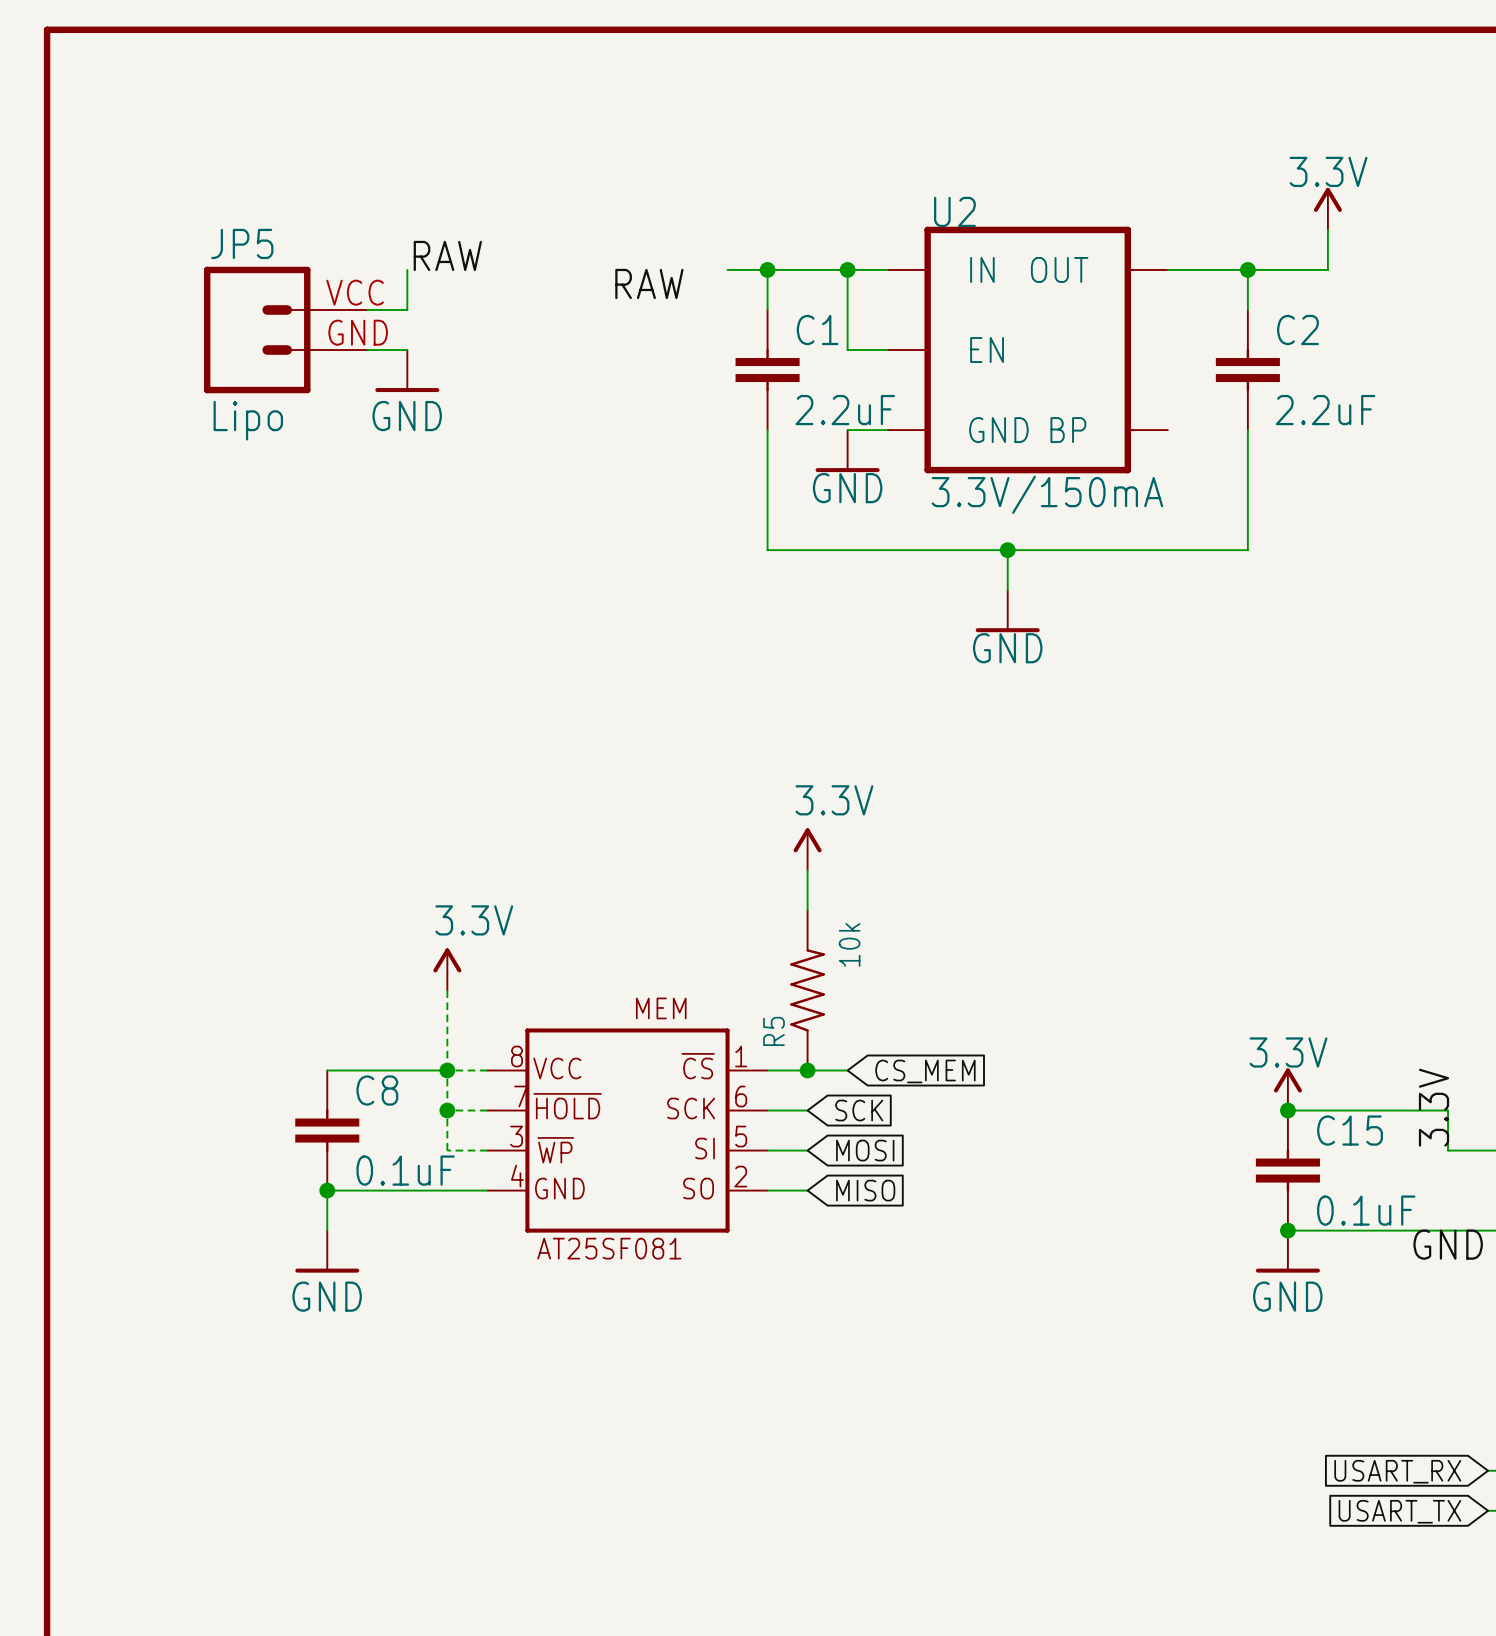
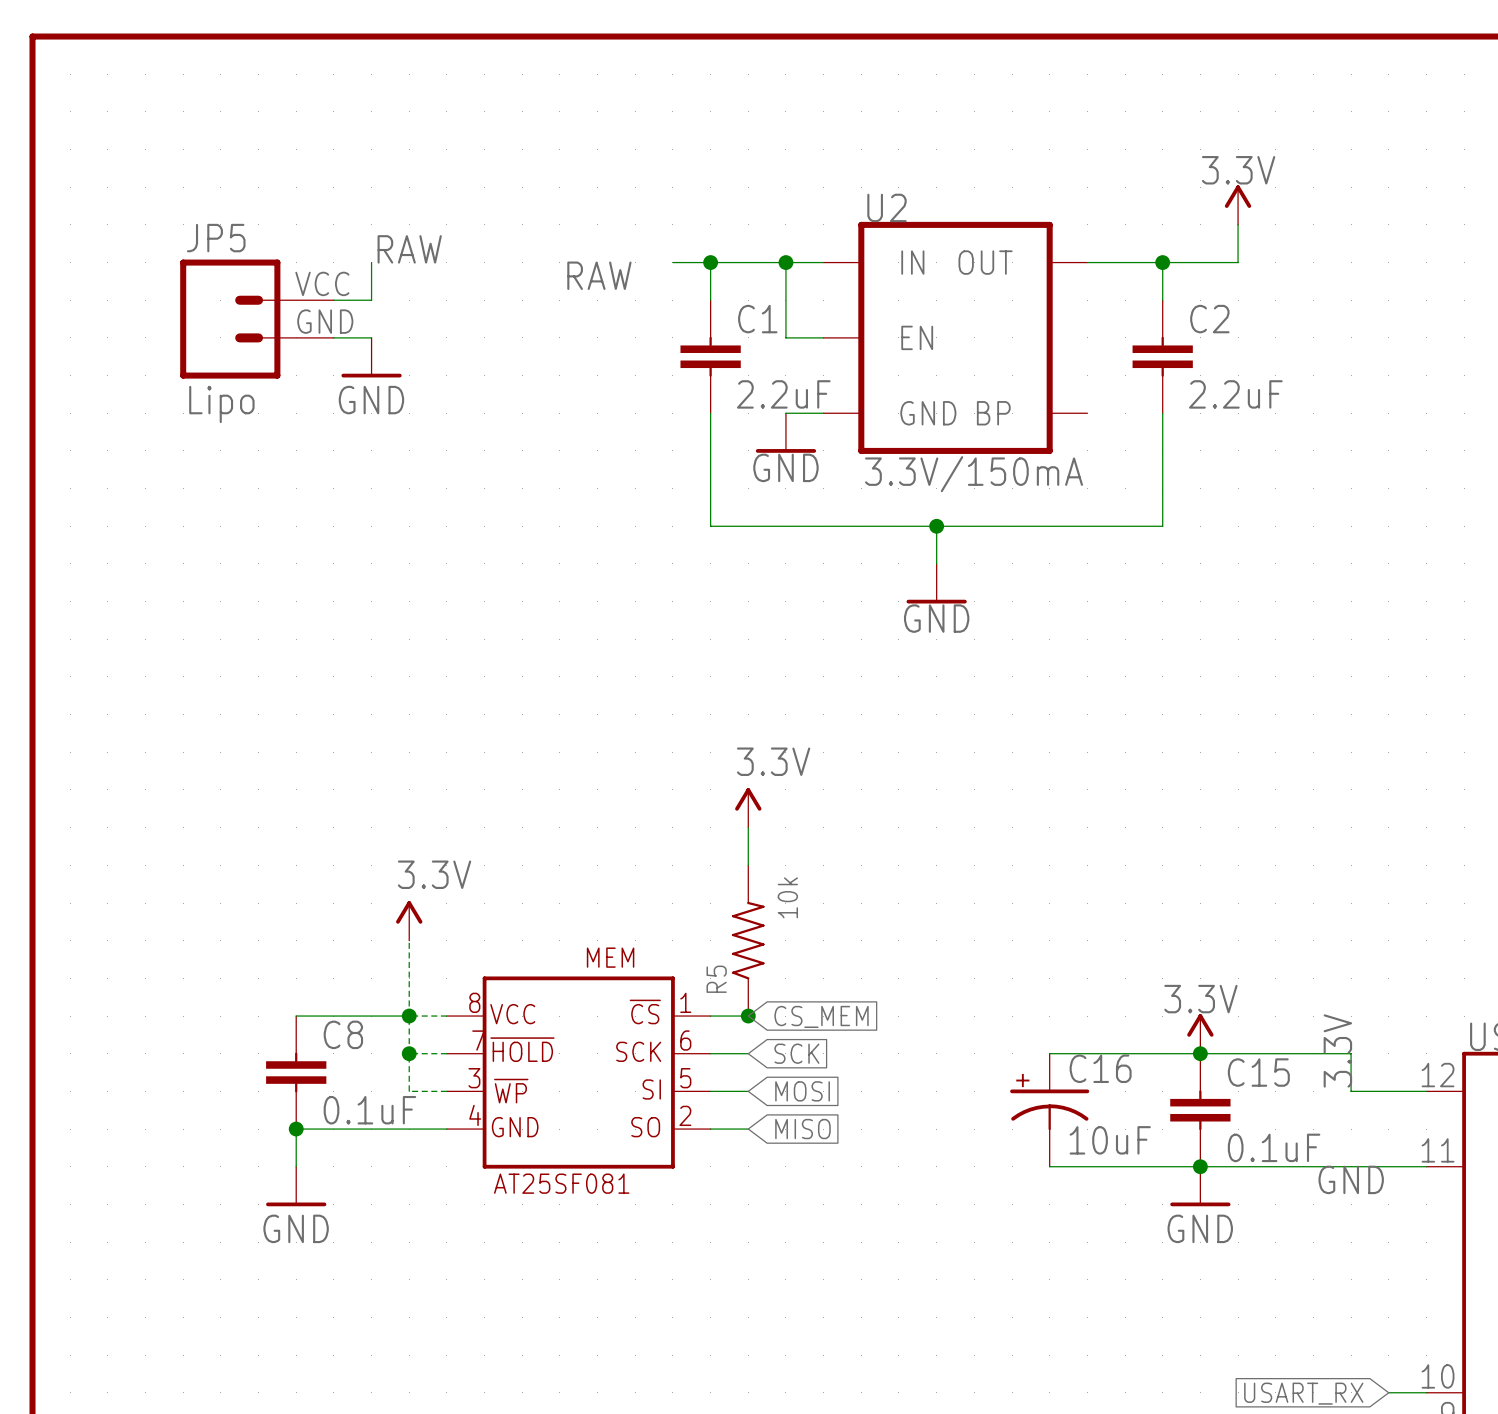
wire: (807, 1070) (847, 1070) -> none
global label position: CS_MEM (925, 1071) -> CS_MEM (821, 1016)
wire: none -> (1049, 1053) (1200, 1053)
C16: none -> 10uF (1049, 1110)
wire: none -> (1049, 1166) (1200, 1166)

